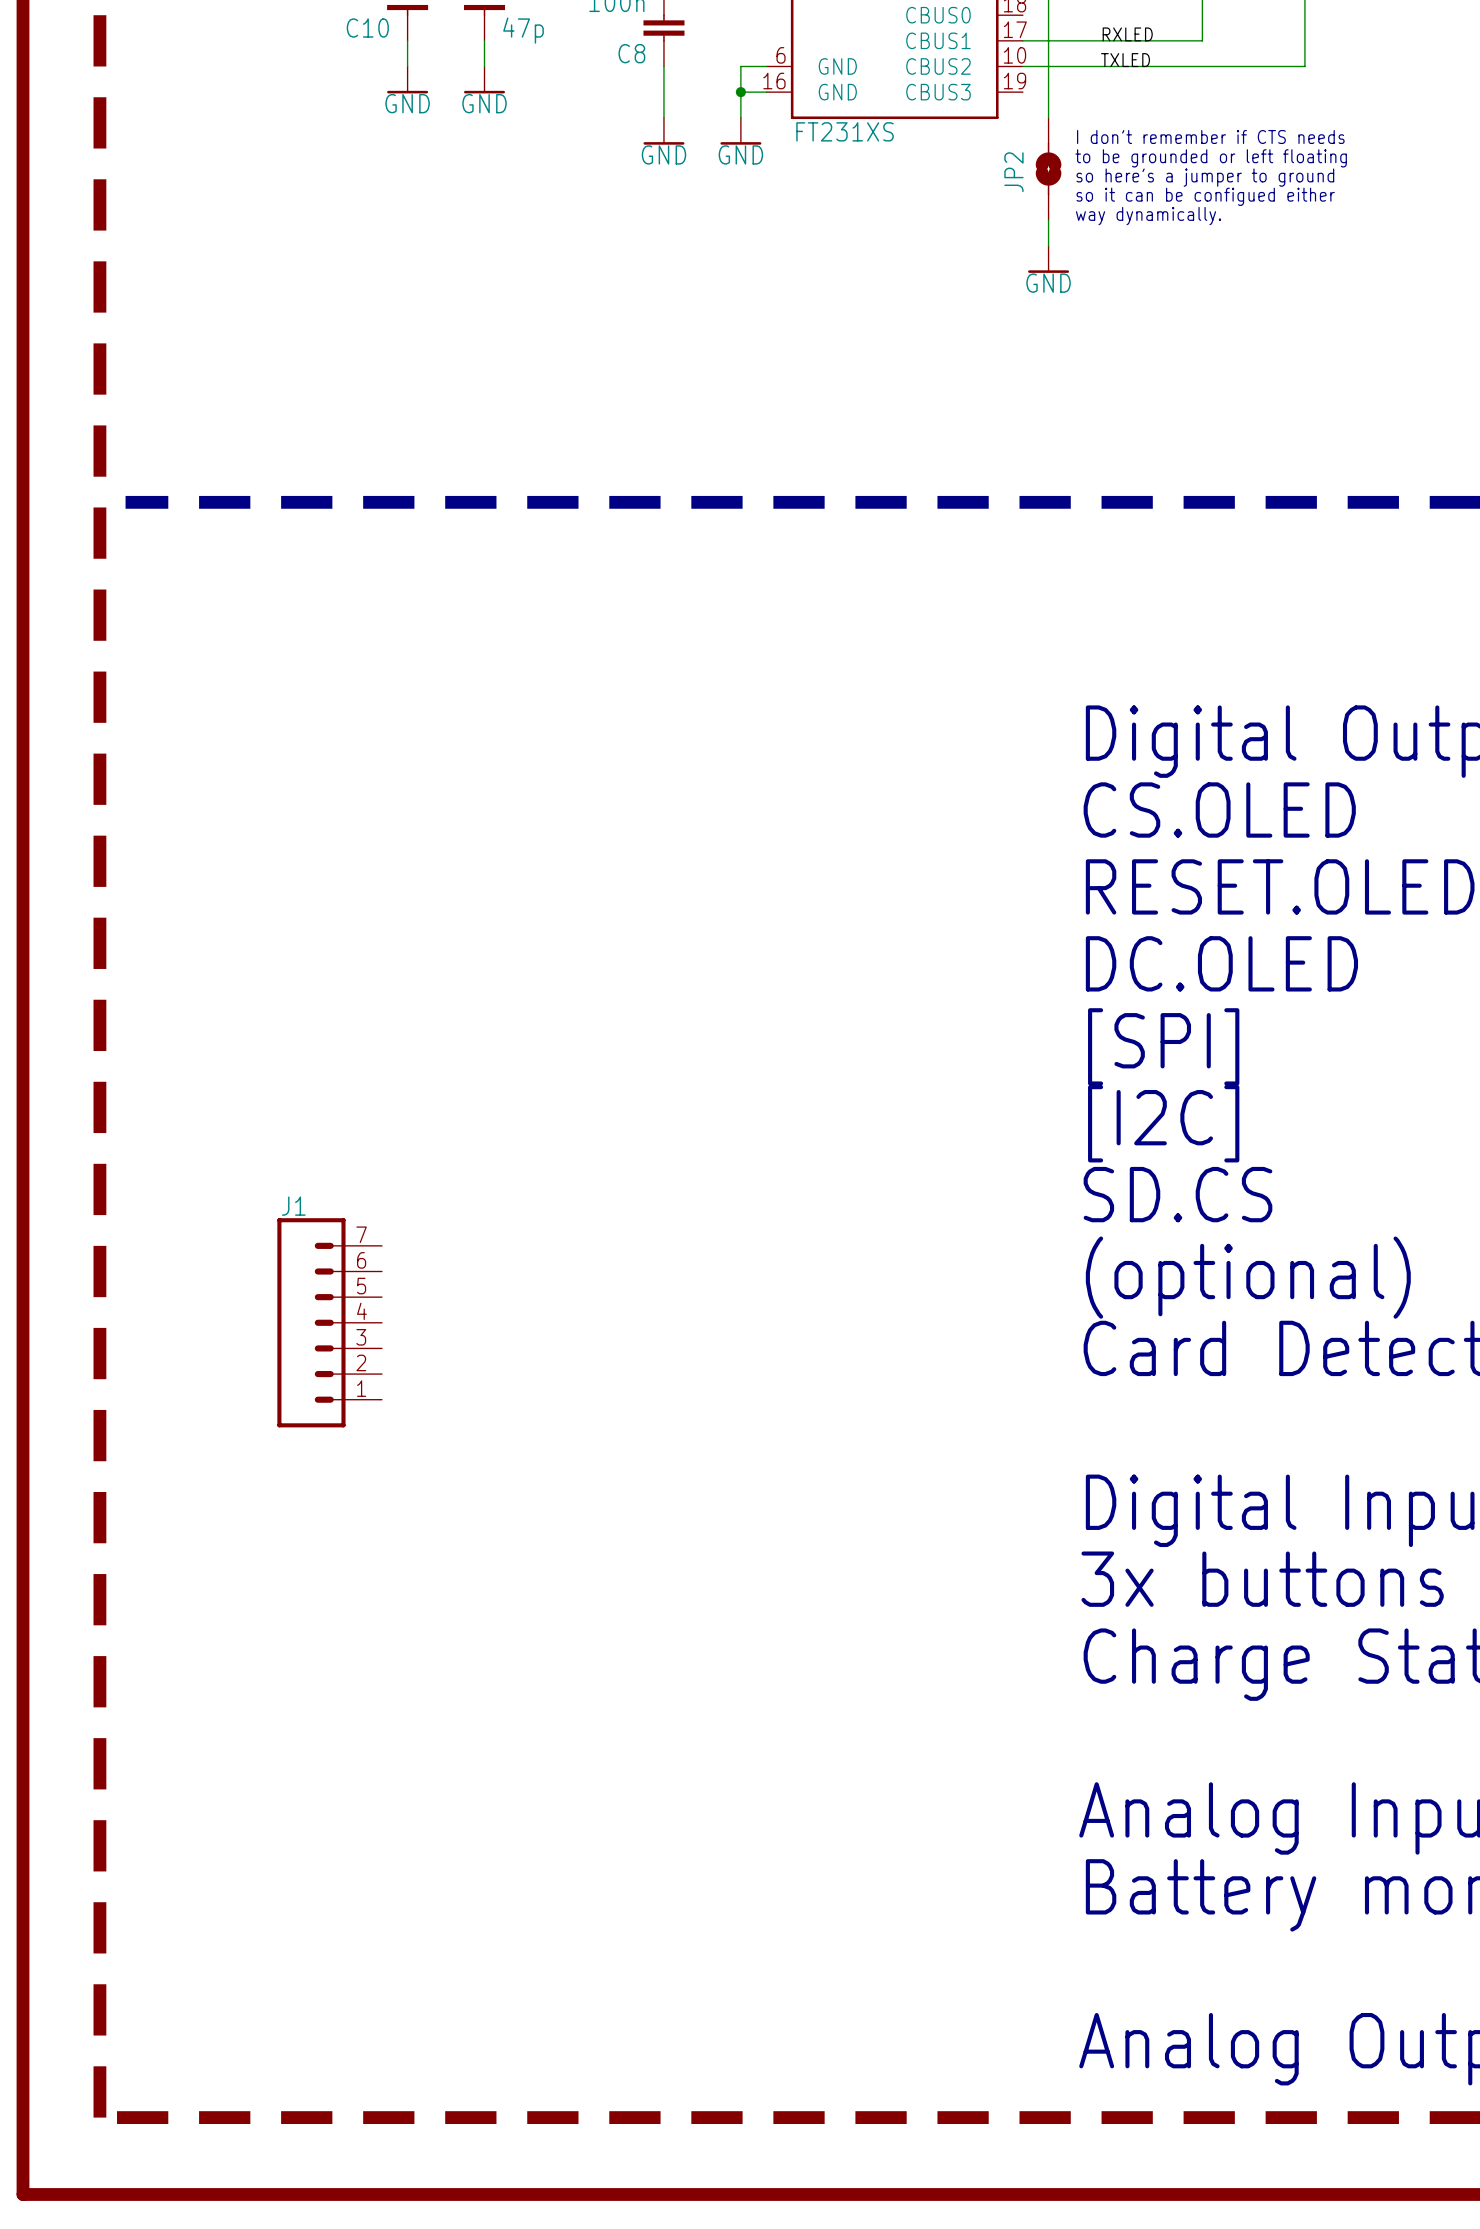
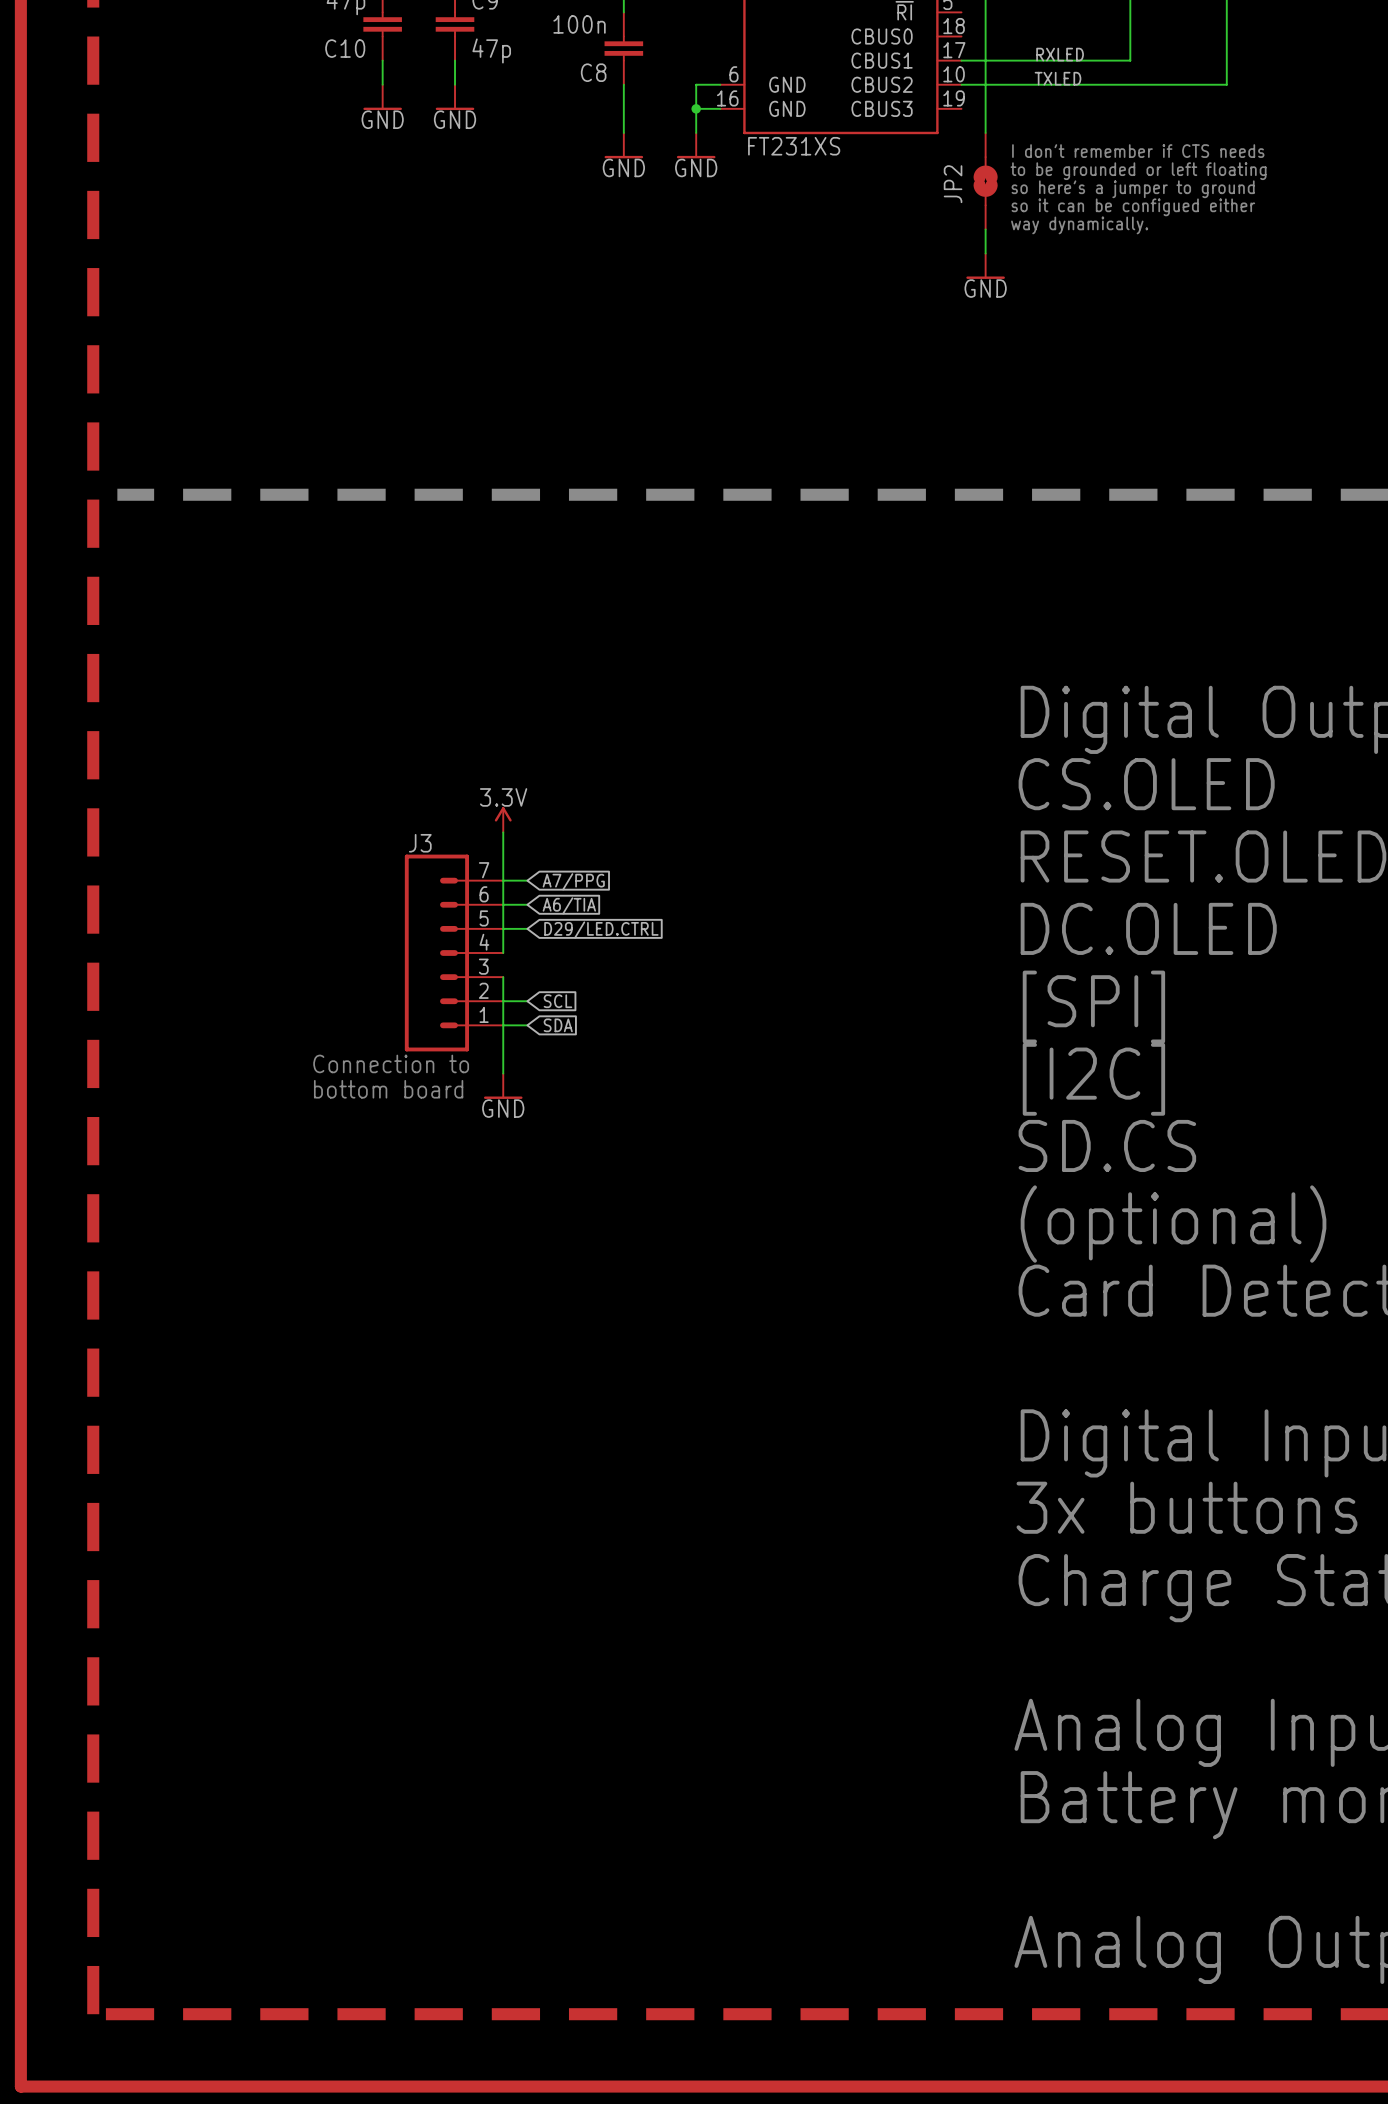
power symbol: none -> 3.3V (503, 819)
wire: none -> (503, 832) (503, 953)
wire: none -> (503, 880) (527, 880)
global label: none -> A7/PPG (573, 881)
wire: none -> (503, 904) (527, 904)
global label: none -> A6/TIA (569, 905)
wire: none -> (503, 928) (527, 928)
global label: none -> D29/LED.CTRL (601, 930)
J3: none -> (454, 953)
wire: none -> (503, 977) (503, 1073)
wire: none -> (503, 1001) (527, 1001)
global label: none -> SCL (557, 1001)
wire: none -> (503, 1025) (527, 1025)
global label: none -> SDA (558, 1025)
text: none -> Connection to (391, 1063)
power symbol: none -> GND (503, 1086)
text: none -> bottom board (388, 1089)
J1: (329, 1322) -> none

